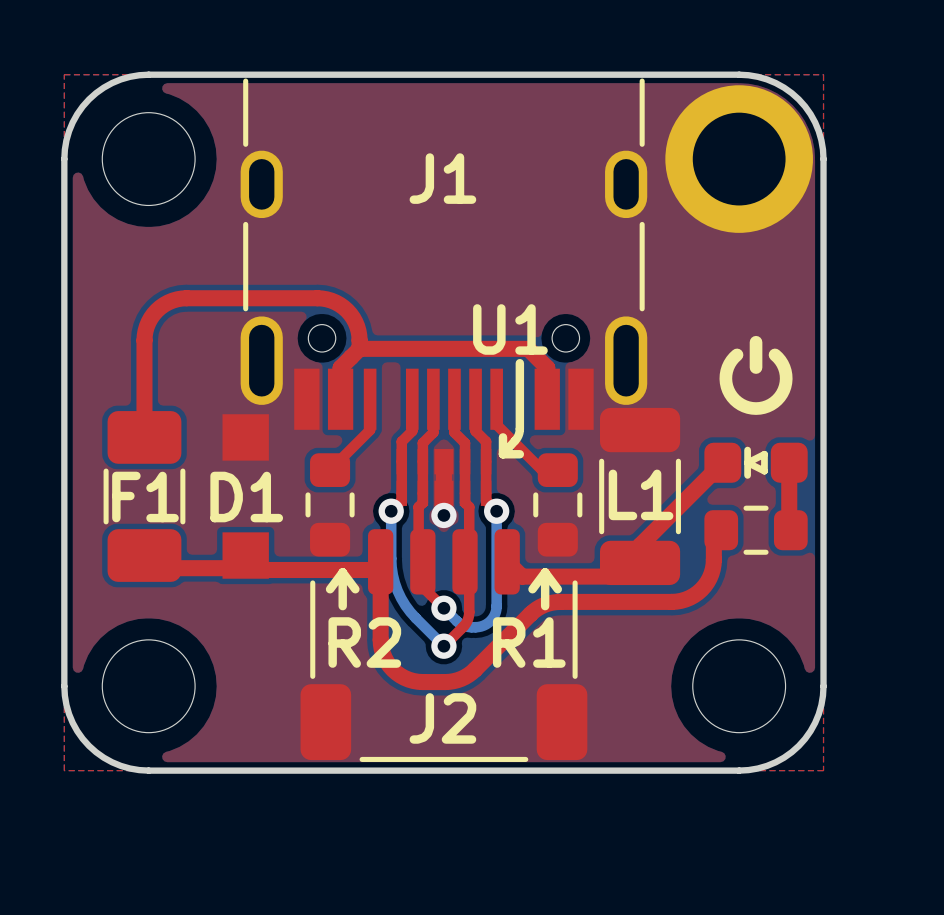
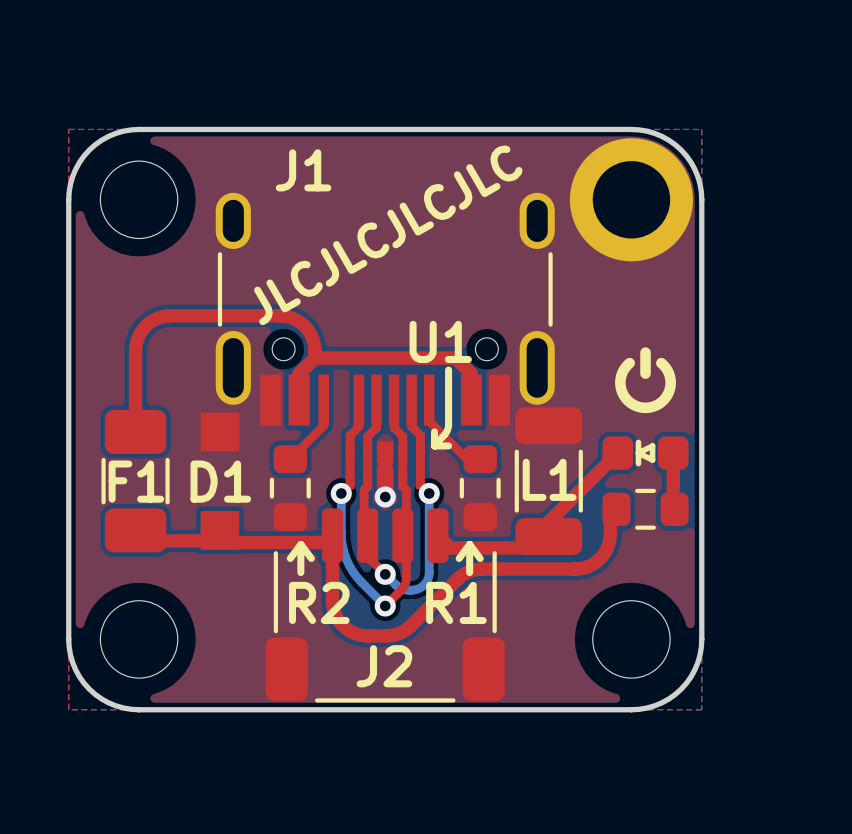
J1 footprint: [240, 78, 648, 430] -> [215, 192, 555, 426]
J1 name position: J1 (442, 178) -> J1 (303, 170)
text: none -> JLCJLCJLCJLC (388, 235)

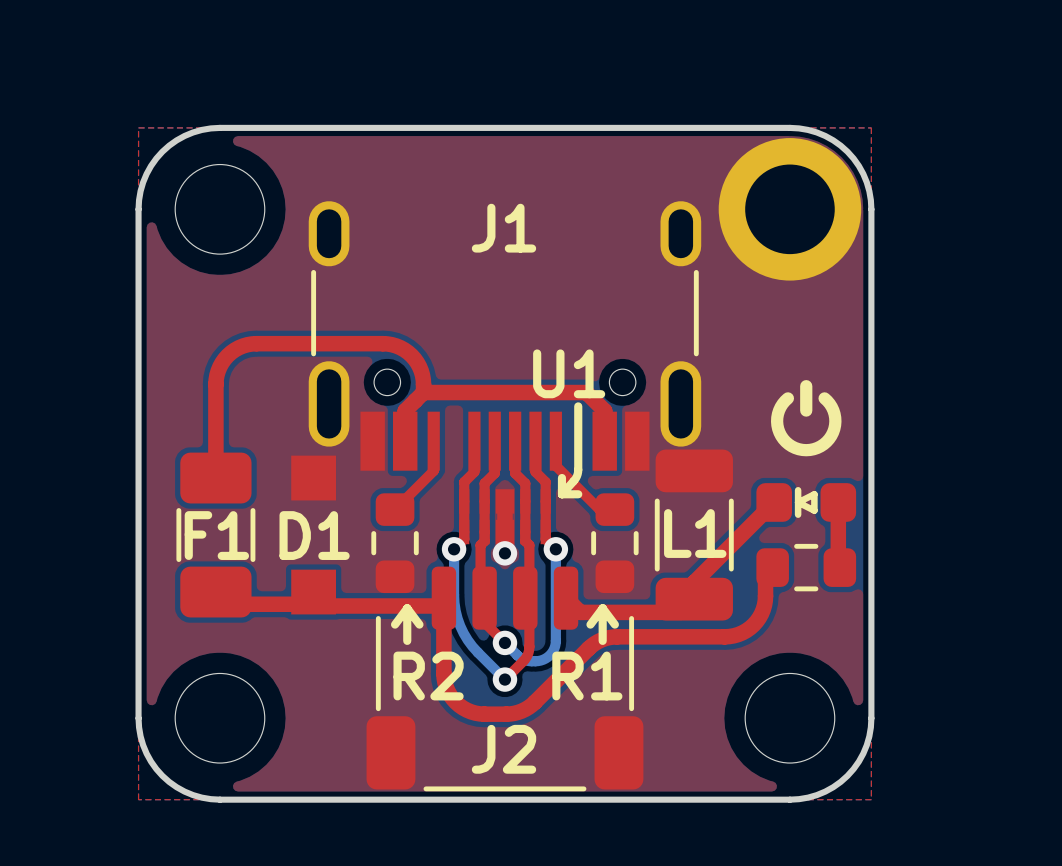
J1 name position: J1 (303, 170) -> J1 (504, 228)
text: JLCJLCJLCJLC (388, 235) -> none

